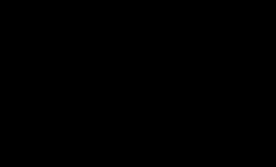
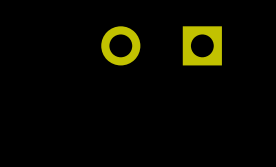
part: none -> (161, 45)

